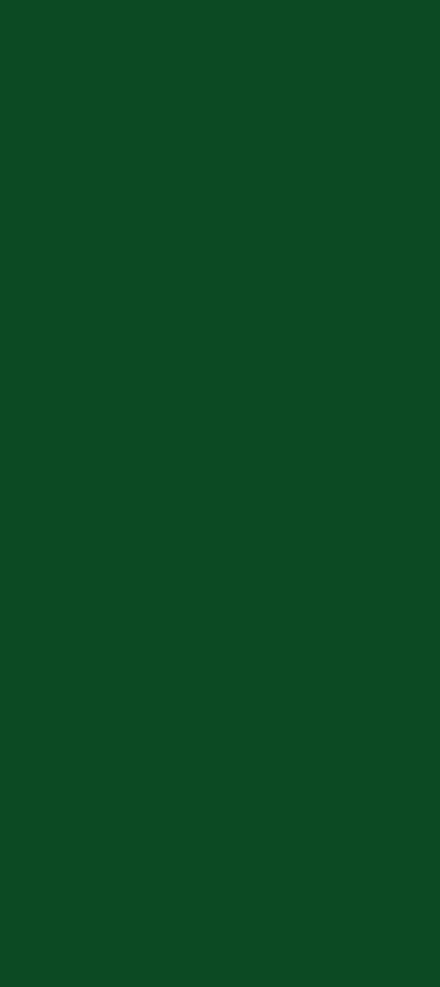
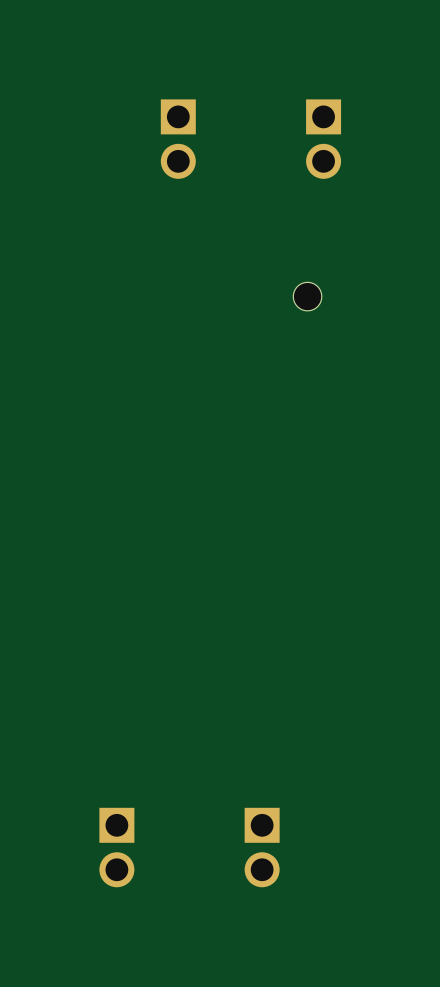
part: none -> (178, 139)
part: none -> (323, 139)
part: none -> (307, 296)
part: none -> (116, 847)
part: none -> (262, 847)

